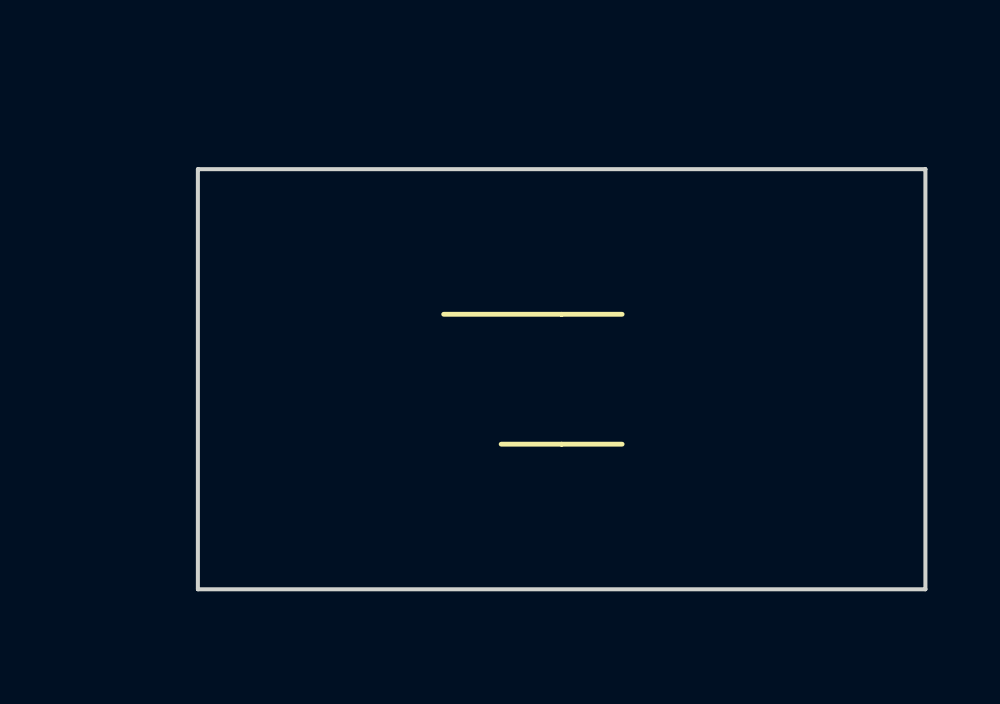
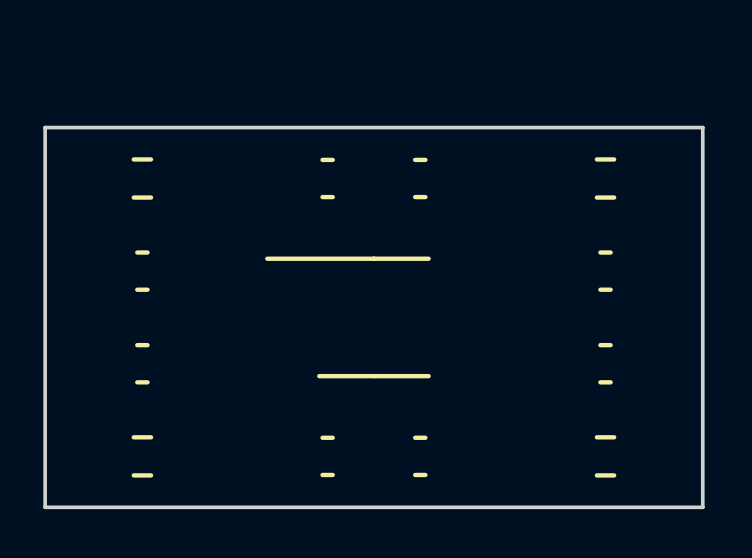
drawing: none -> [131, 157, 154, 200]
drawing: none -> [320, 157, 335, 200]
drawing: none -> [412, 157, 428, 200]
drawing: none -> [594, 157, 617, 200]
drawing: none -> [135, 250, 150, 292]
drawing: none -> [598, 250, 613, 292]
drawing: none -> [135, 342, 150, 385]
drawing: none -> [598, 342, 613, 385]
drawing: none -> [131, 435, 154, 478]
drawing: none -> [320, 435, 335, 478]
drawing: none -> [412, 435, 428, 478]
drawing: none -> [594, 435, 617, 478]

